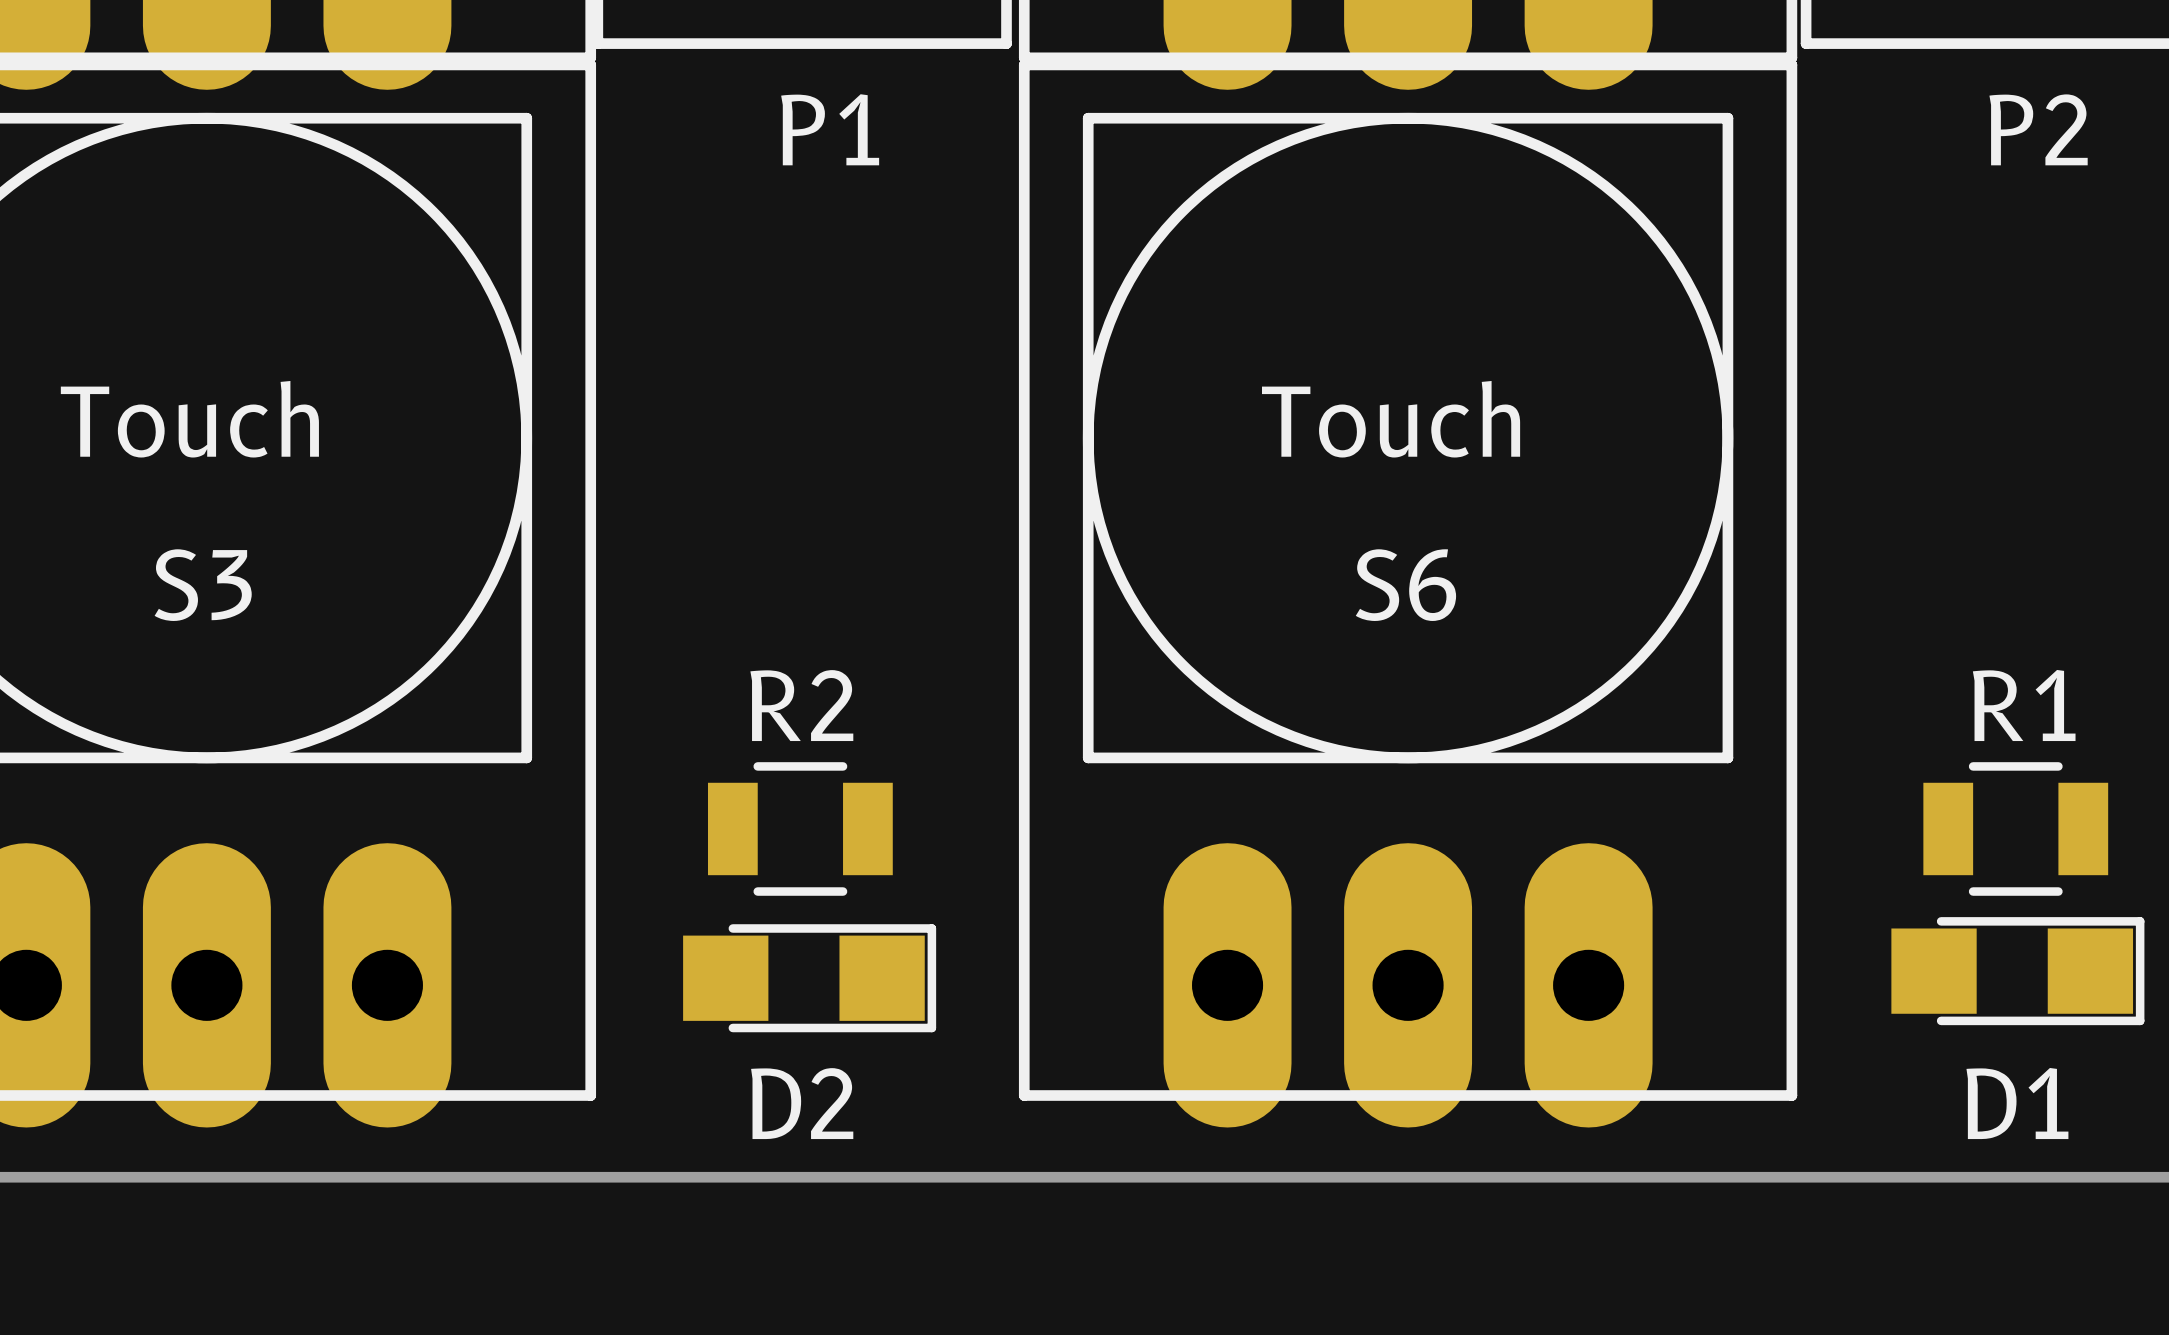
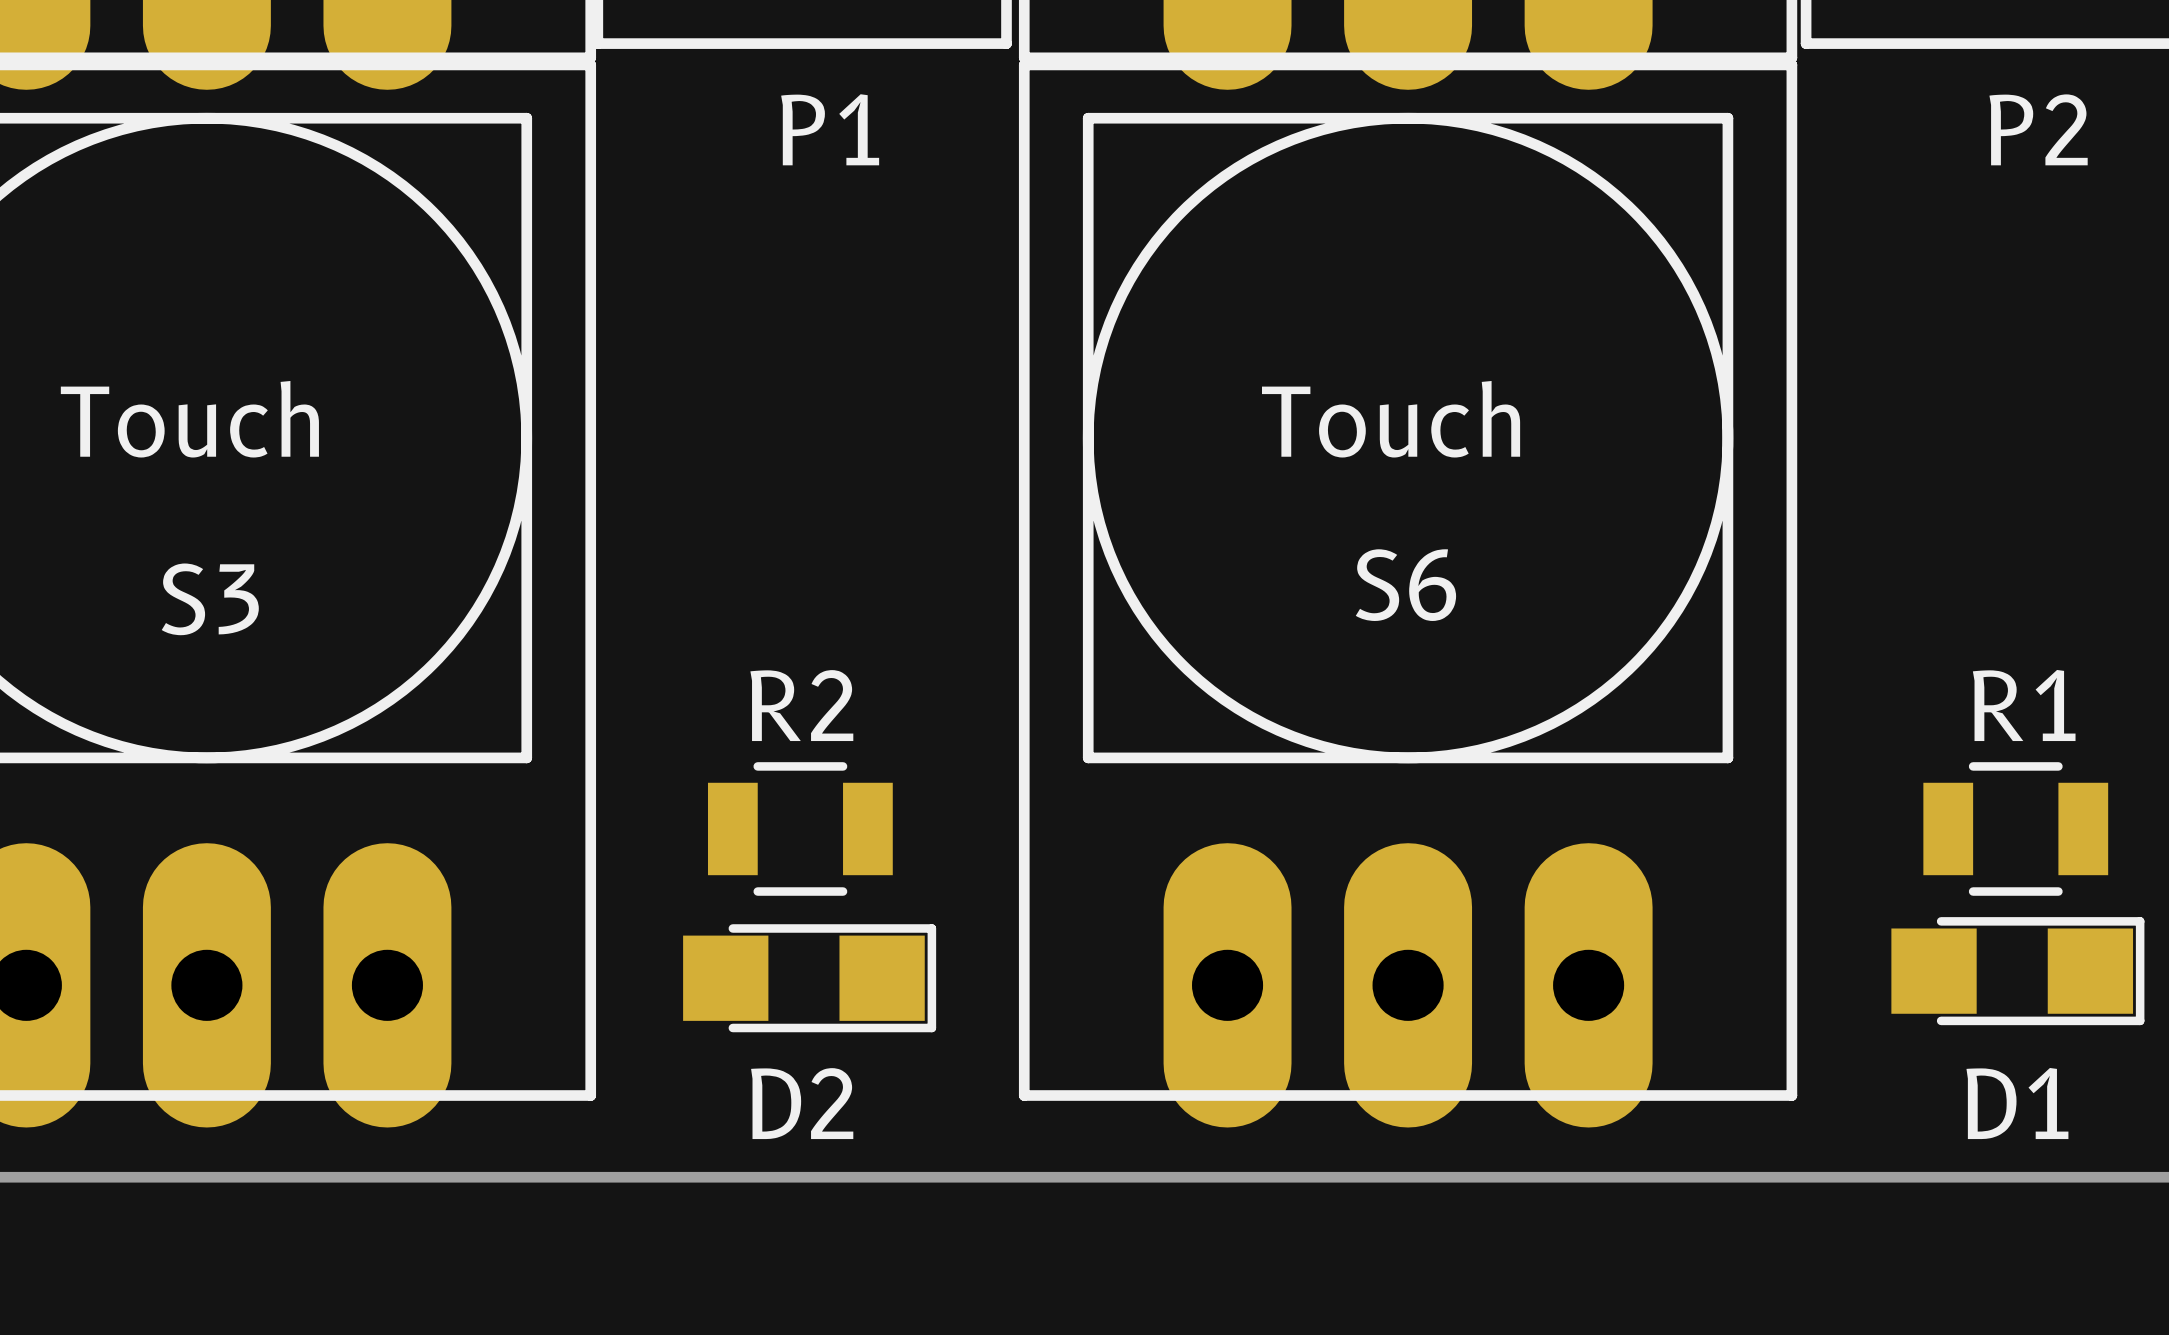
S3 name position: S3 (203, 585) -> S3 (210, 599)

